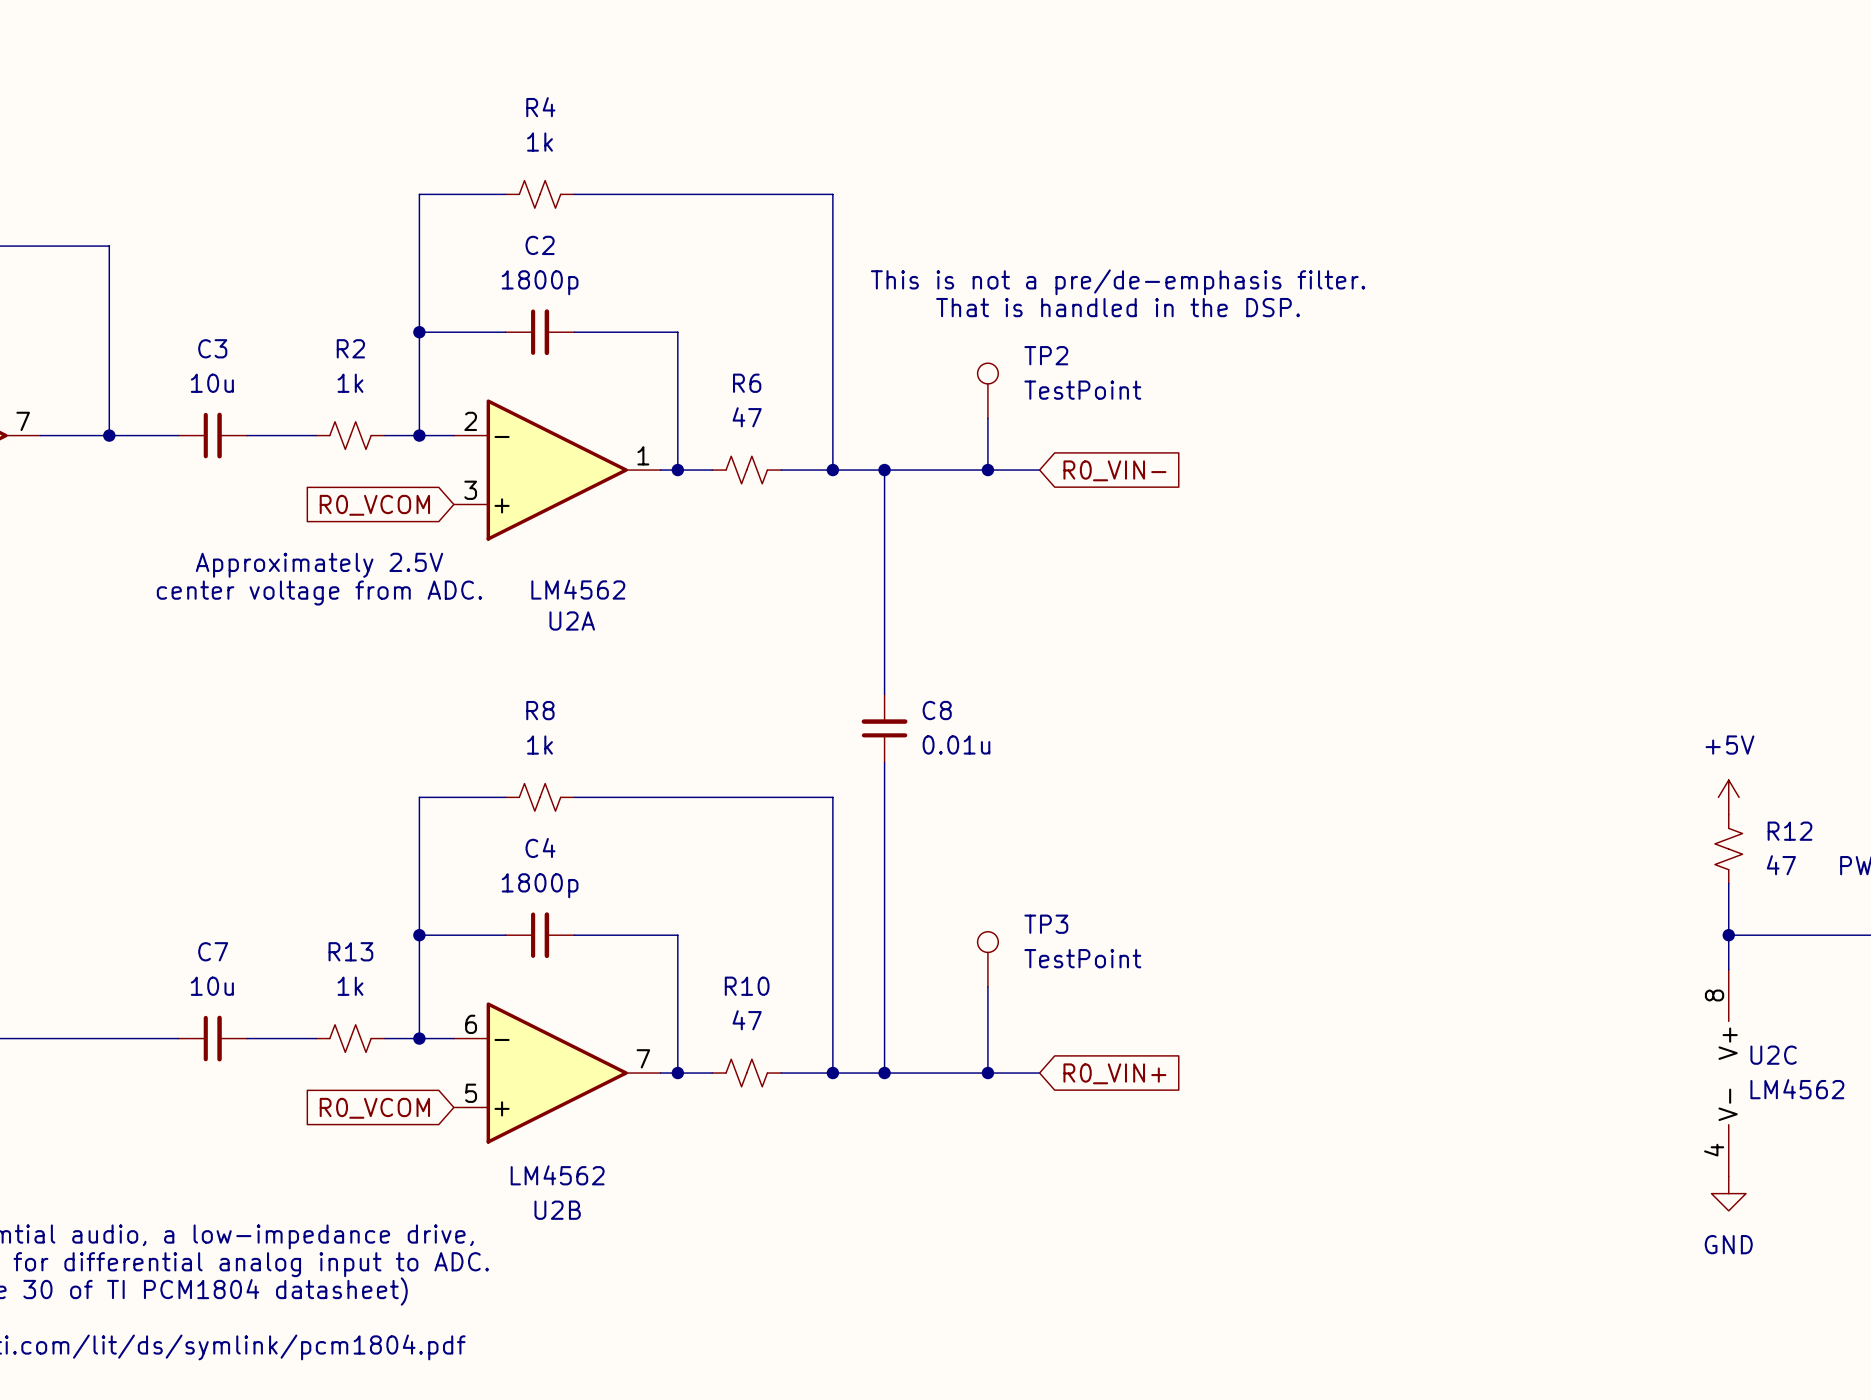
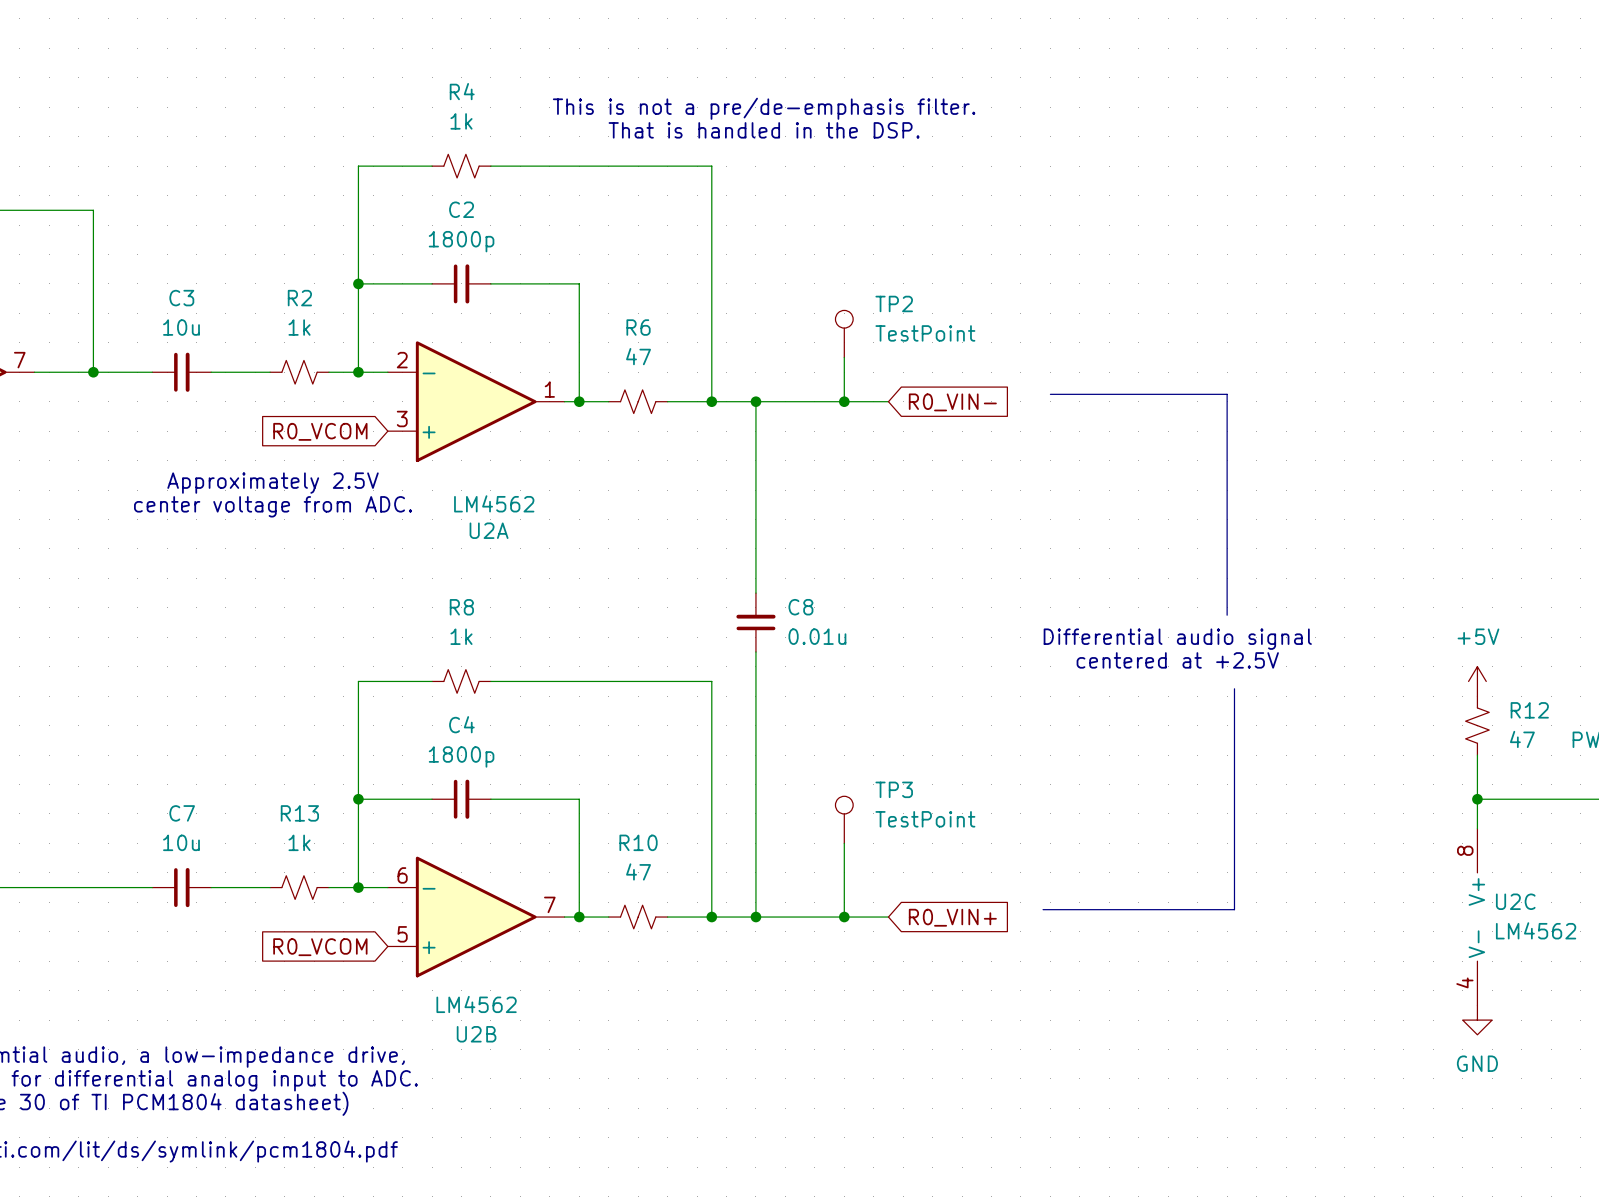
text position: This is not a pre/de-emphasis filter. (1118, 282) -> This is not a pre/de-emphasis filter. (764, 108)
text position: That is handled in the DSP. (1118, 307) -> That is handled in the DSP. (764, 130)
line: none -> (1050, 394) (1227, 394) (1227, 615)
text: none -> Differential audio signal (1177, 639)
text: none -> centered at +2.5V (1177, 660)
line: none -> (1234, 688) (1234, 909) (1043, 909)

